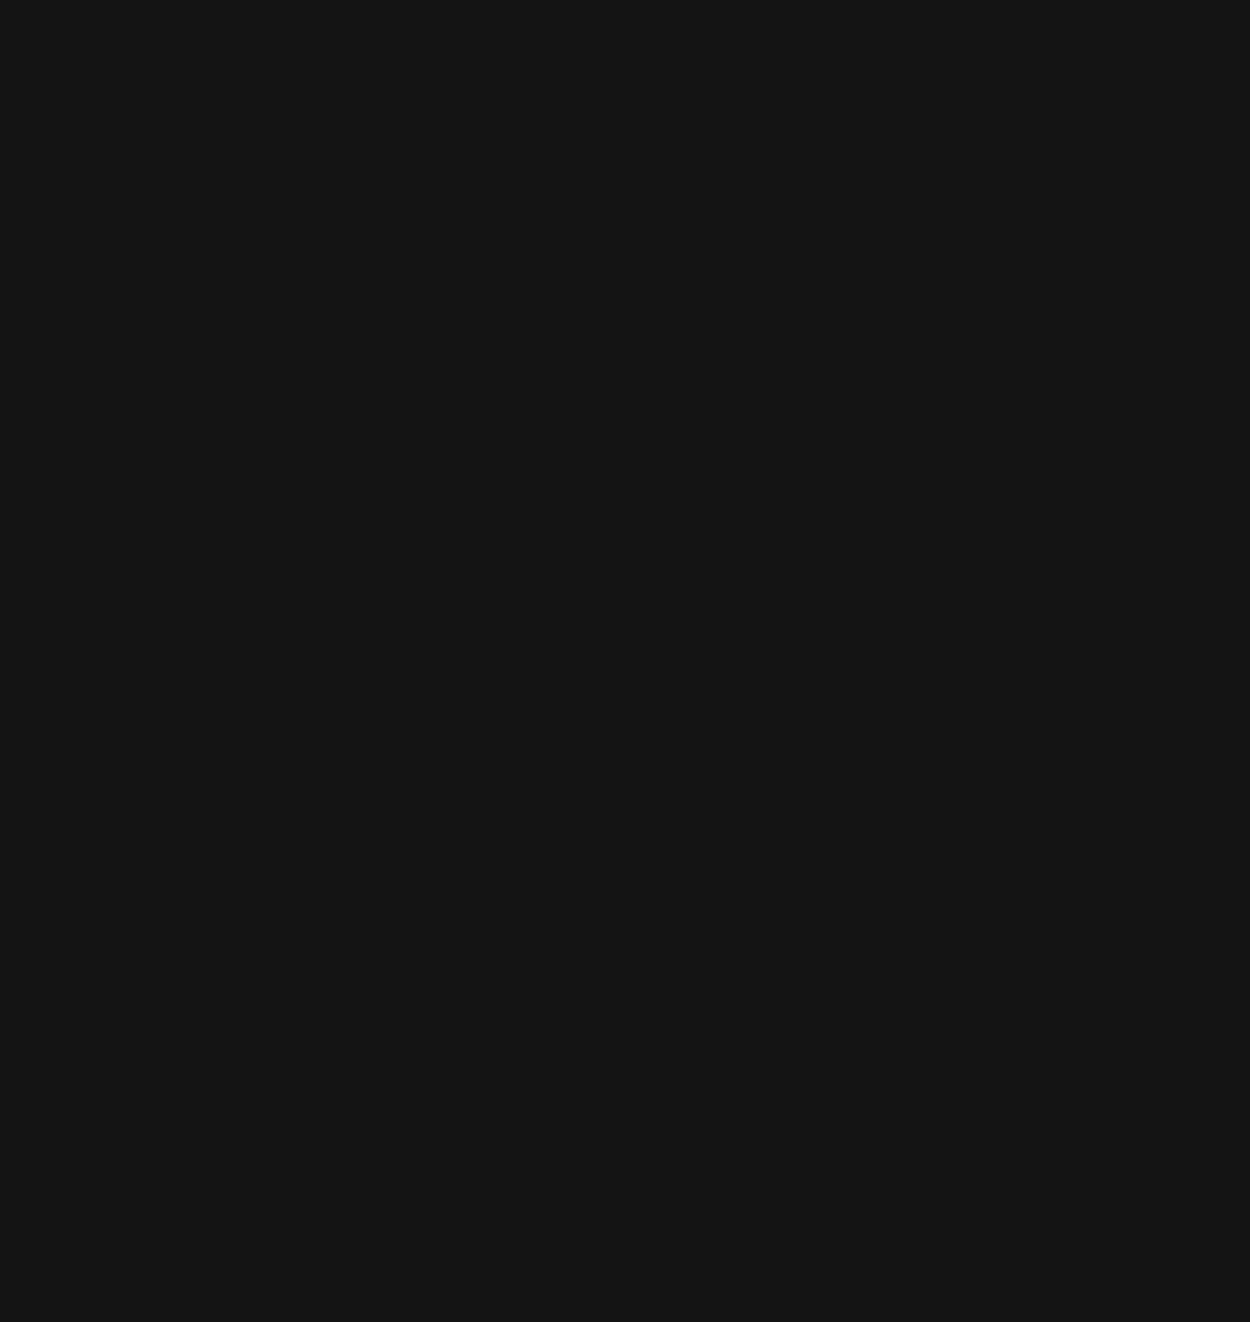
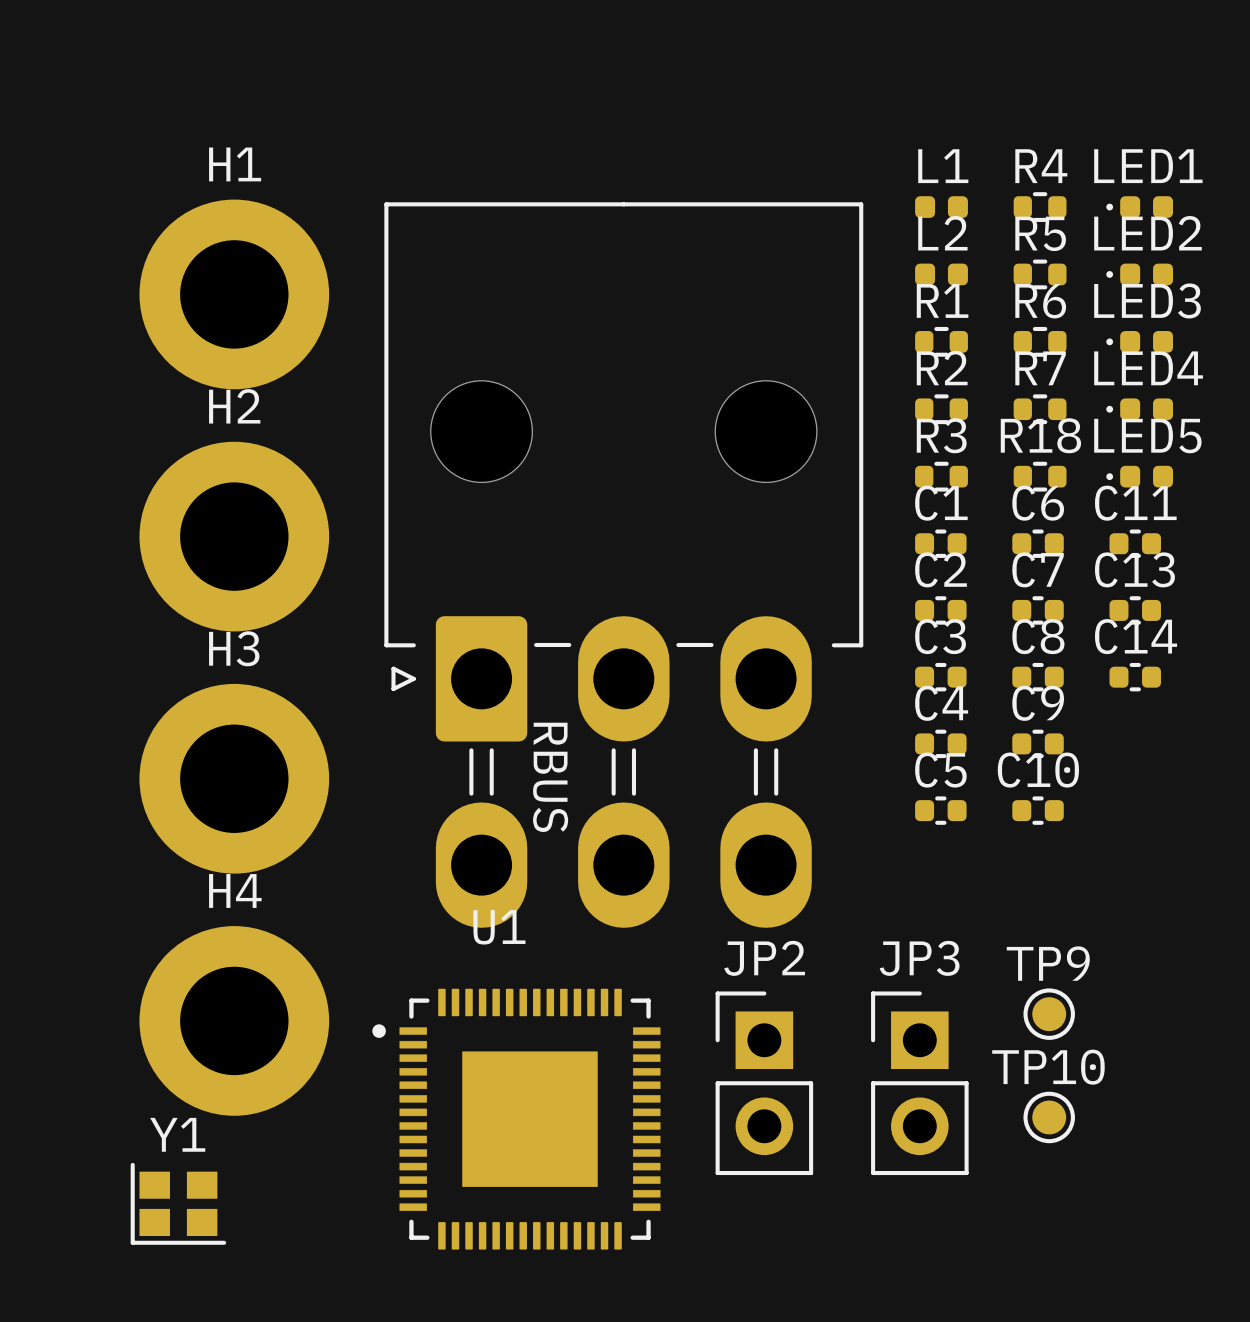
L1: none -> (941, 207)
R4: none -> (1040, 207)
LED1: none -> (1139, 207)
L2: none -> (941, 274)
R5: none -> (1040, 274)
LED2: none -> (1139, 274)
H1: none -> (234, 294)
R1: none -> (941, 341)
R6: none -> (1040, 341)
LED3: none -> (1139, 341)
R2: none -> (941, 409)
R7: none -> (1040, 409)
LED4: none -> (1139, 409)
R3: none -> (941, 476)
R18: none -> (1040, 476)
LED5: none -> (1139, 476)
H2: none -> (234, 536)
C1: none -> (940, 543)
C6: none -> (1038, 543)
C11: none -> (1135, 543)
part: none -> (623, 565)
C2: none -> (940, 610)
C7: none -> (1038, 610)
C13: none -> (1135, 610)
C3: none -> (940, 677)
C8: none -> (1038, 677)
C14: none -> (1135, 677)
C4: none -> (940, 743)
C9: none -> (1038, 743)
H3: none -> (234, 778)
C5: none -> (940, 810)
C10: none -> (1038, 810)
TP9: none -> (1049, 1014)
H4: none -> (234, 1020)
JP2: none -> (764, 1083)
JP3: none -> (919, 1083)
TP10: none -> (1049, 1117)
U1: none -> (516, 1119)
Y1: none -> (178, 1203)

